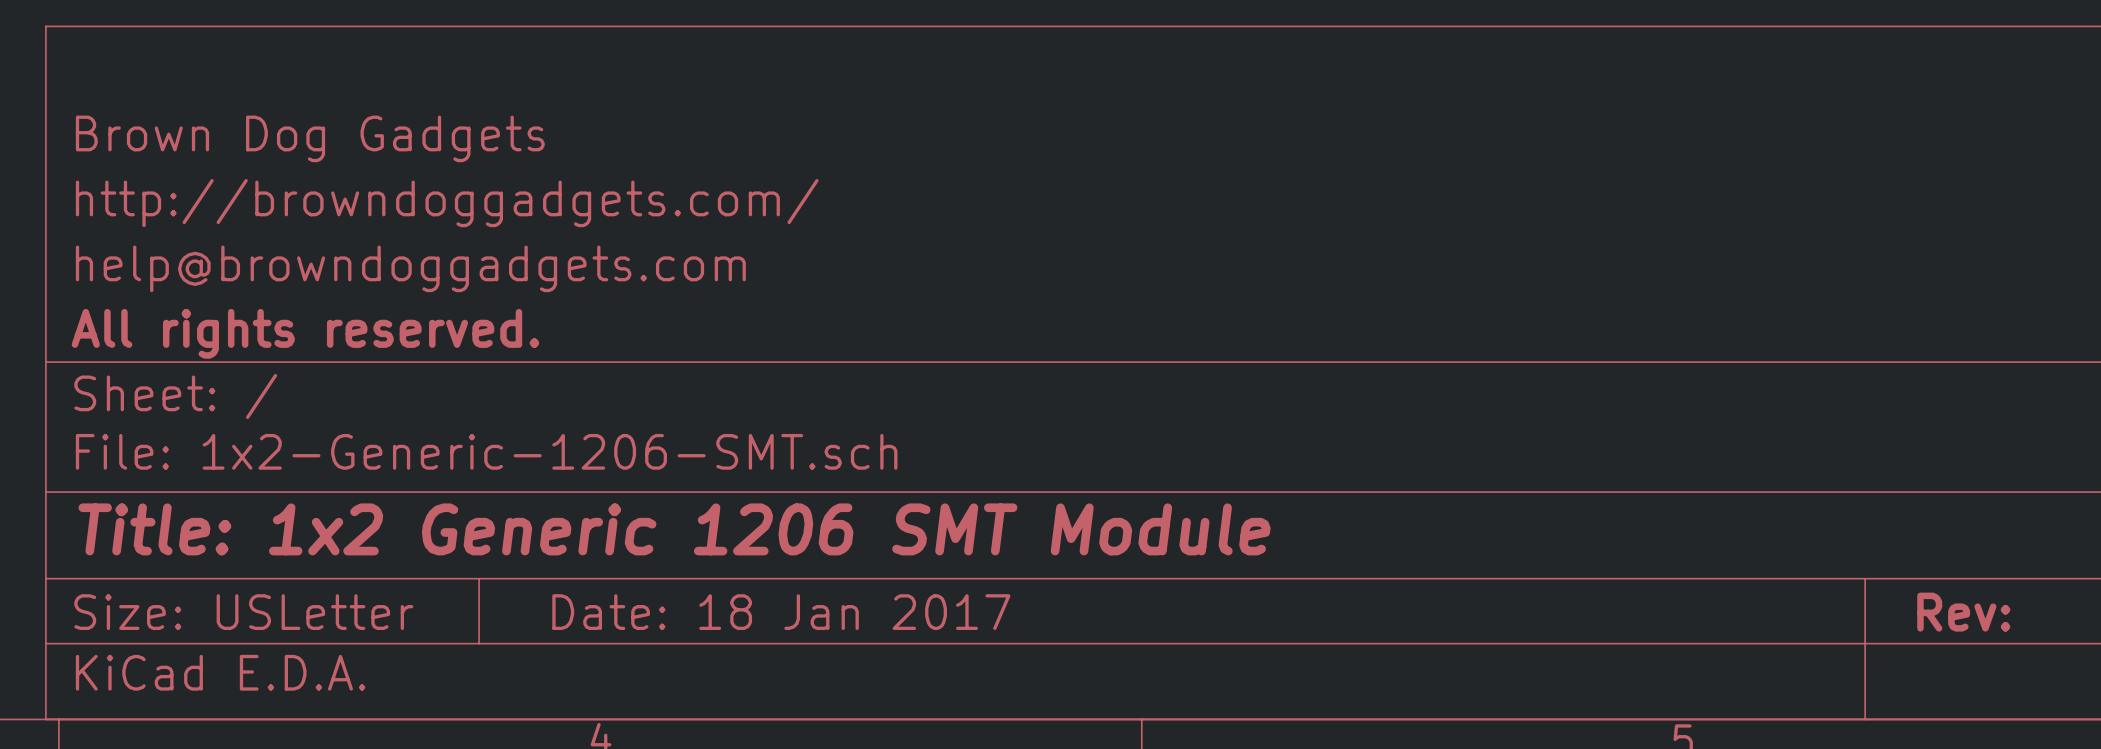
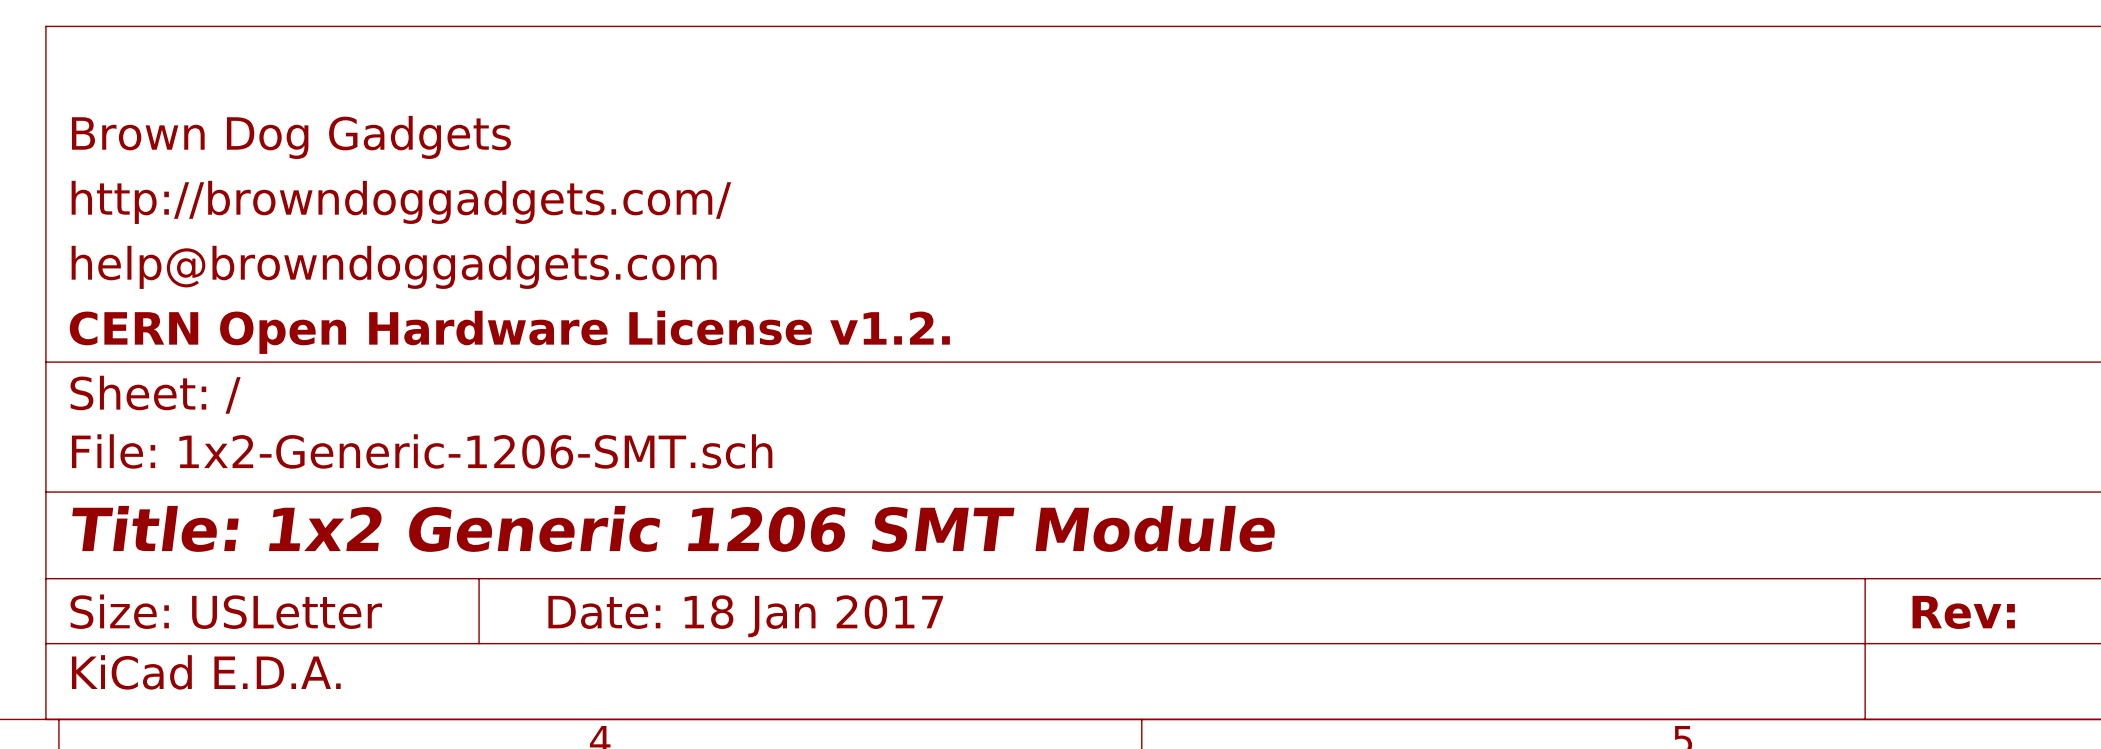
title block: All rights reserved. (305, 333) -> CERN Open Hardware License v1.2. (509, 332)

